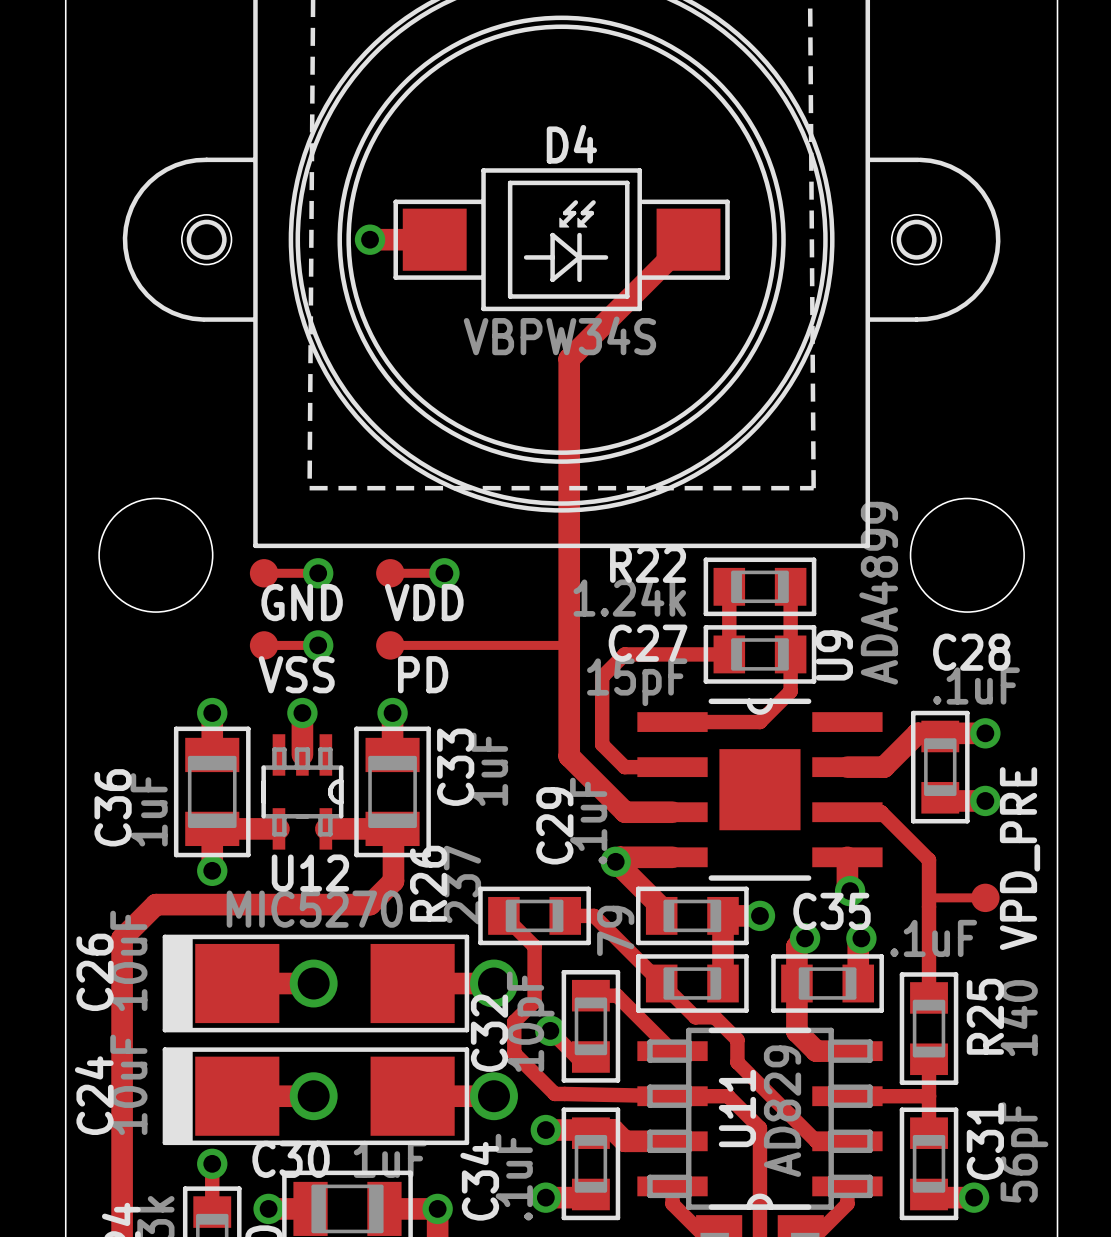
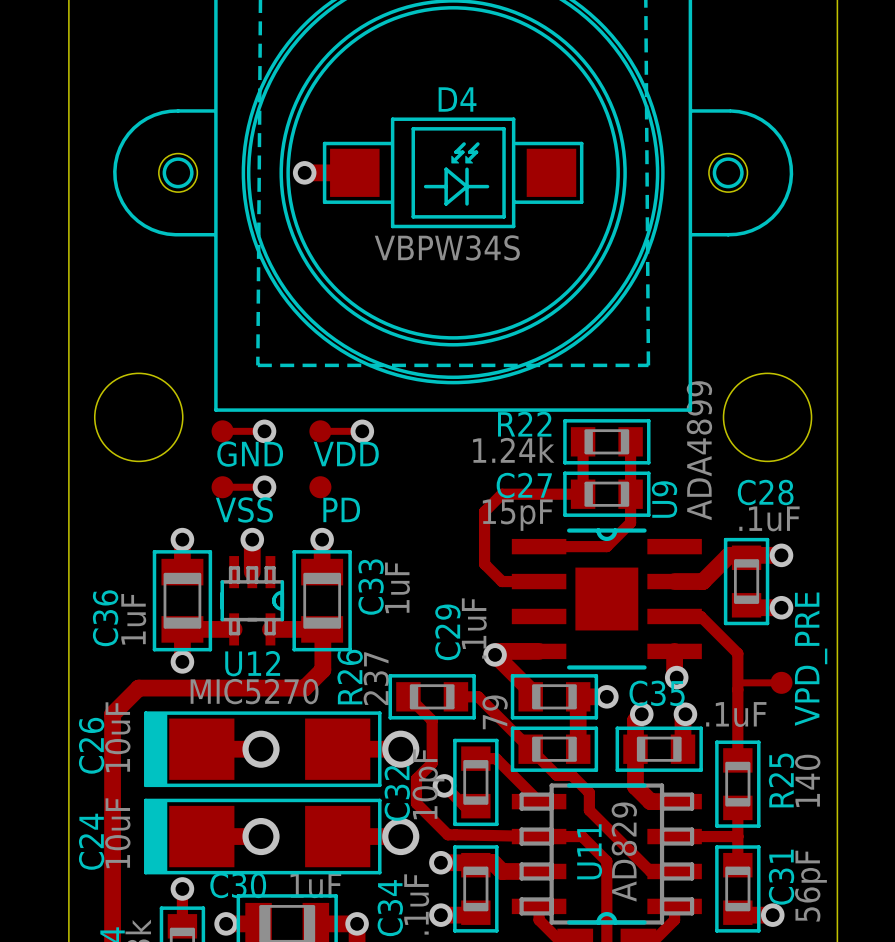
track: (688, 239) (569, 359) (569, 756) (625, 812) (672, 812) -> none
track: (390, 645) (569, 645) -> none

